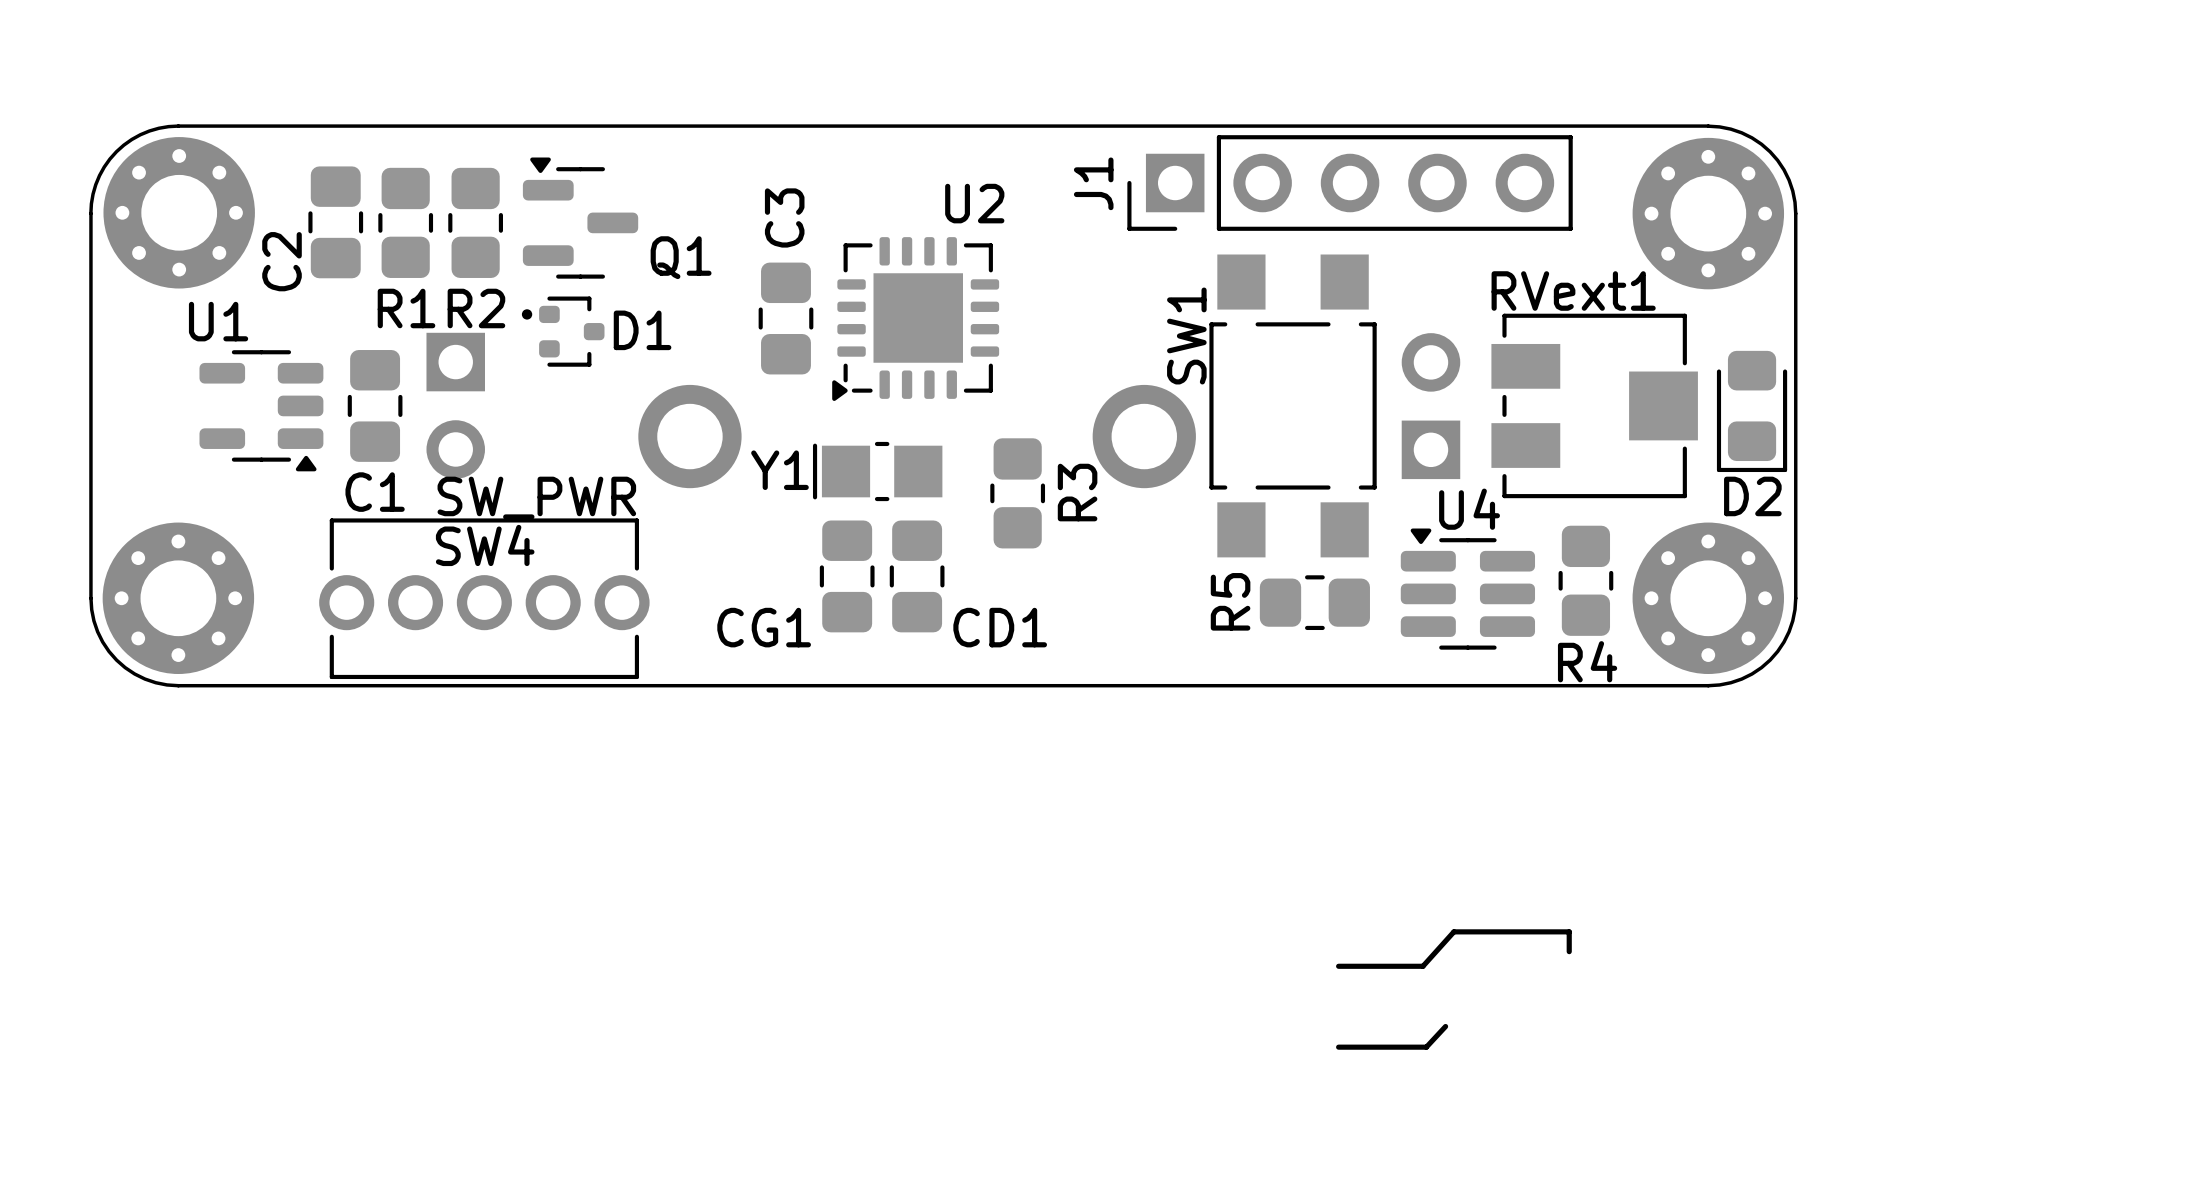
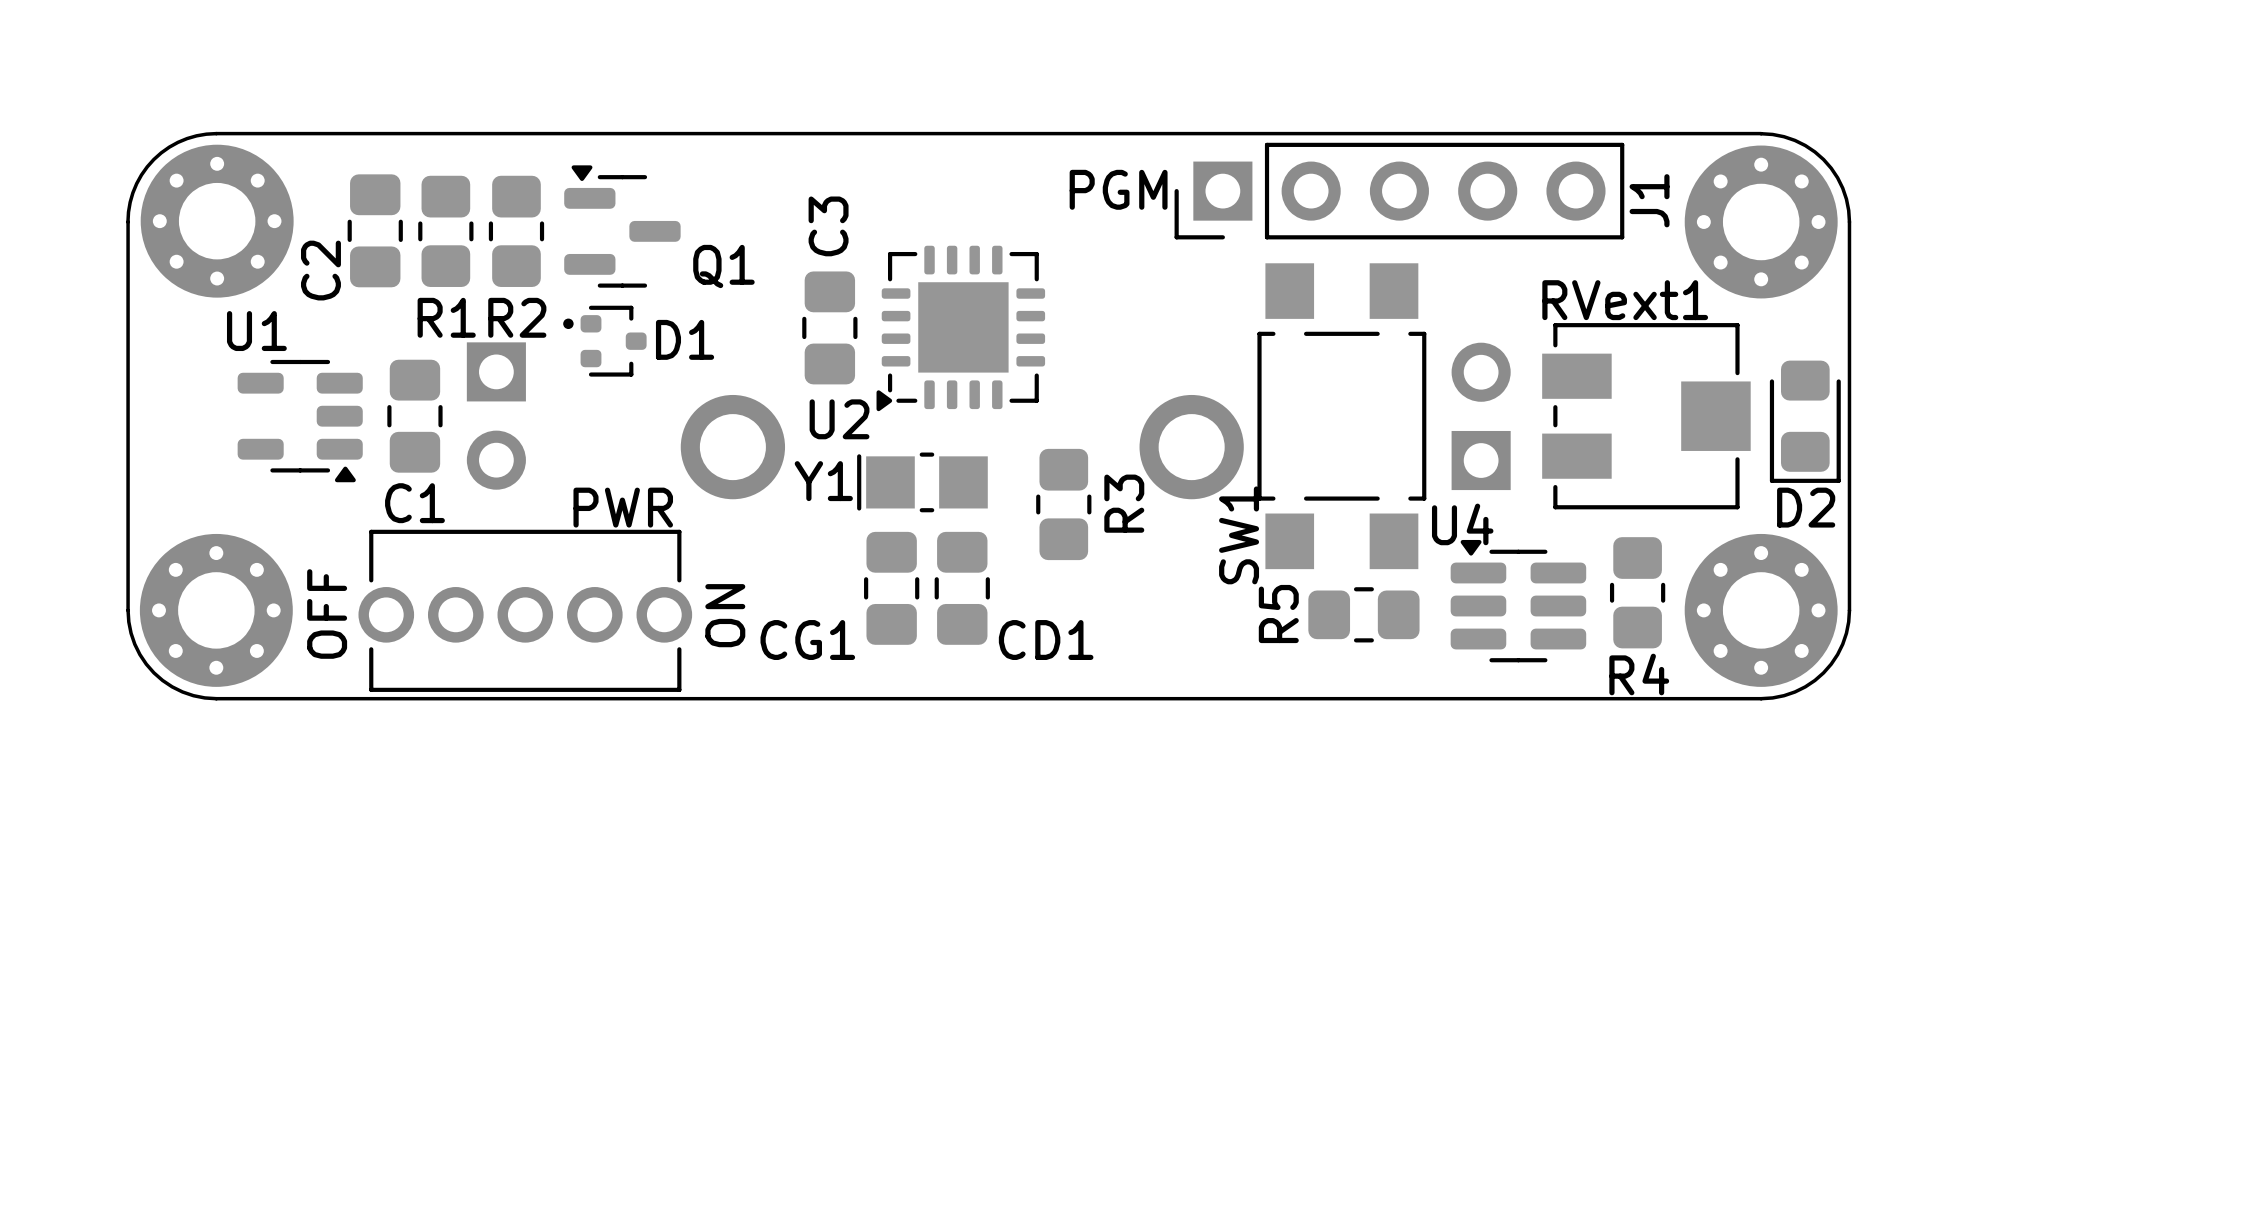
text: none -> PGM (1118, 189)
J1 name position: J1 (1093, 183) -> J1 (1649, 200)
U2 name position: U2 (974, 203) -> U2 (839, 419)
SW1 name position: SW1 (1186, 336) -> SW1 (1239, 535)
SW4 value: SW_PWR (536, 498) -> PWR (623, 507)
U4 name position: U4 (1469, 509) -> U4 (1462, 524)
SW4 name: SW4 (485, 545) -> none
text: none -> OFF (327, 614)
text: none -> ON (725, 615)
line: (1569, 951) (1569, 931) (1453, 931) (1422, 966) (1338, 966) -> none
line: (1445, 1026) (1426, 1047) (1338, 1047) -> none

